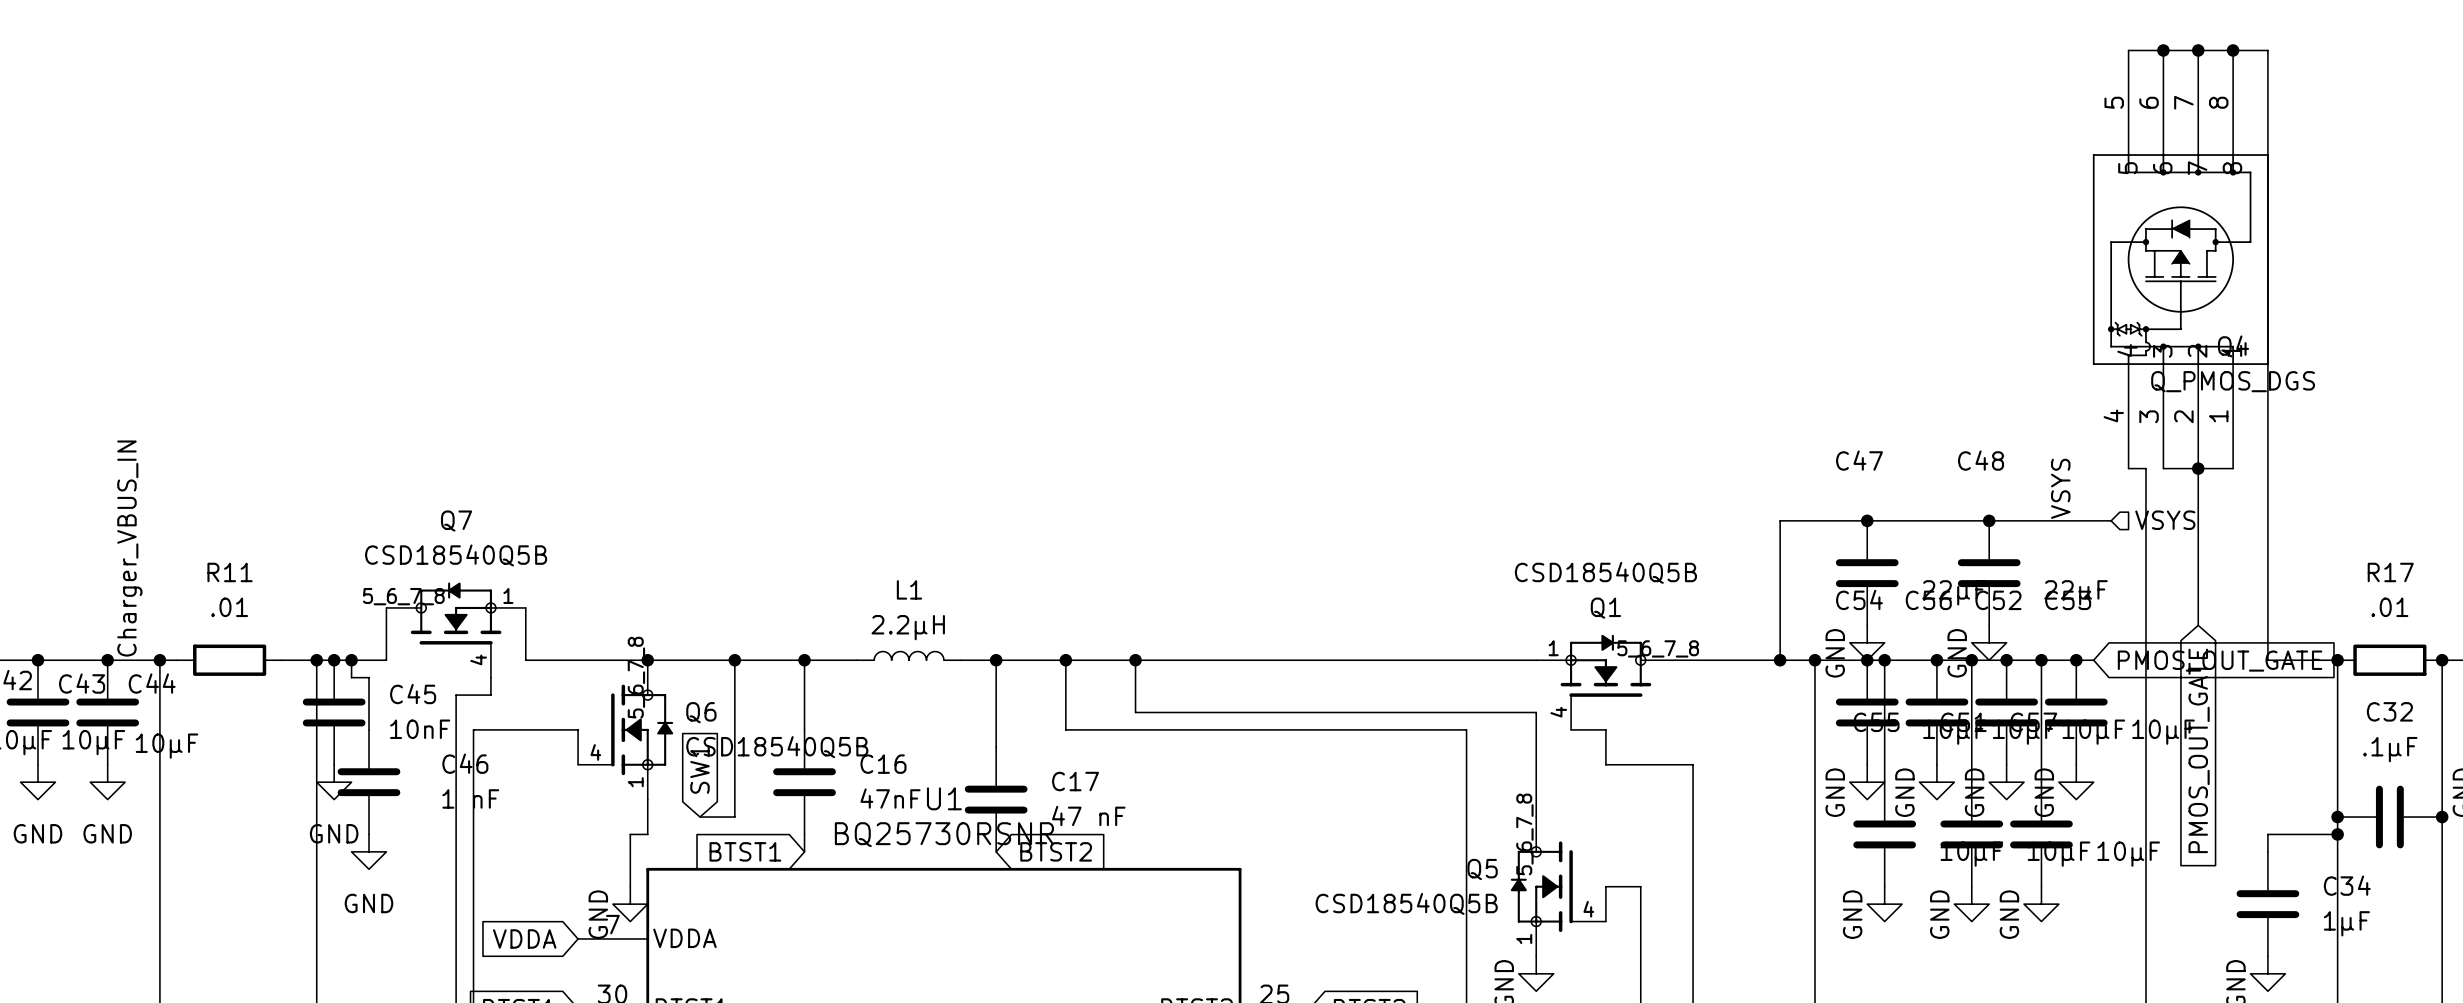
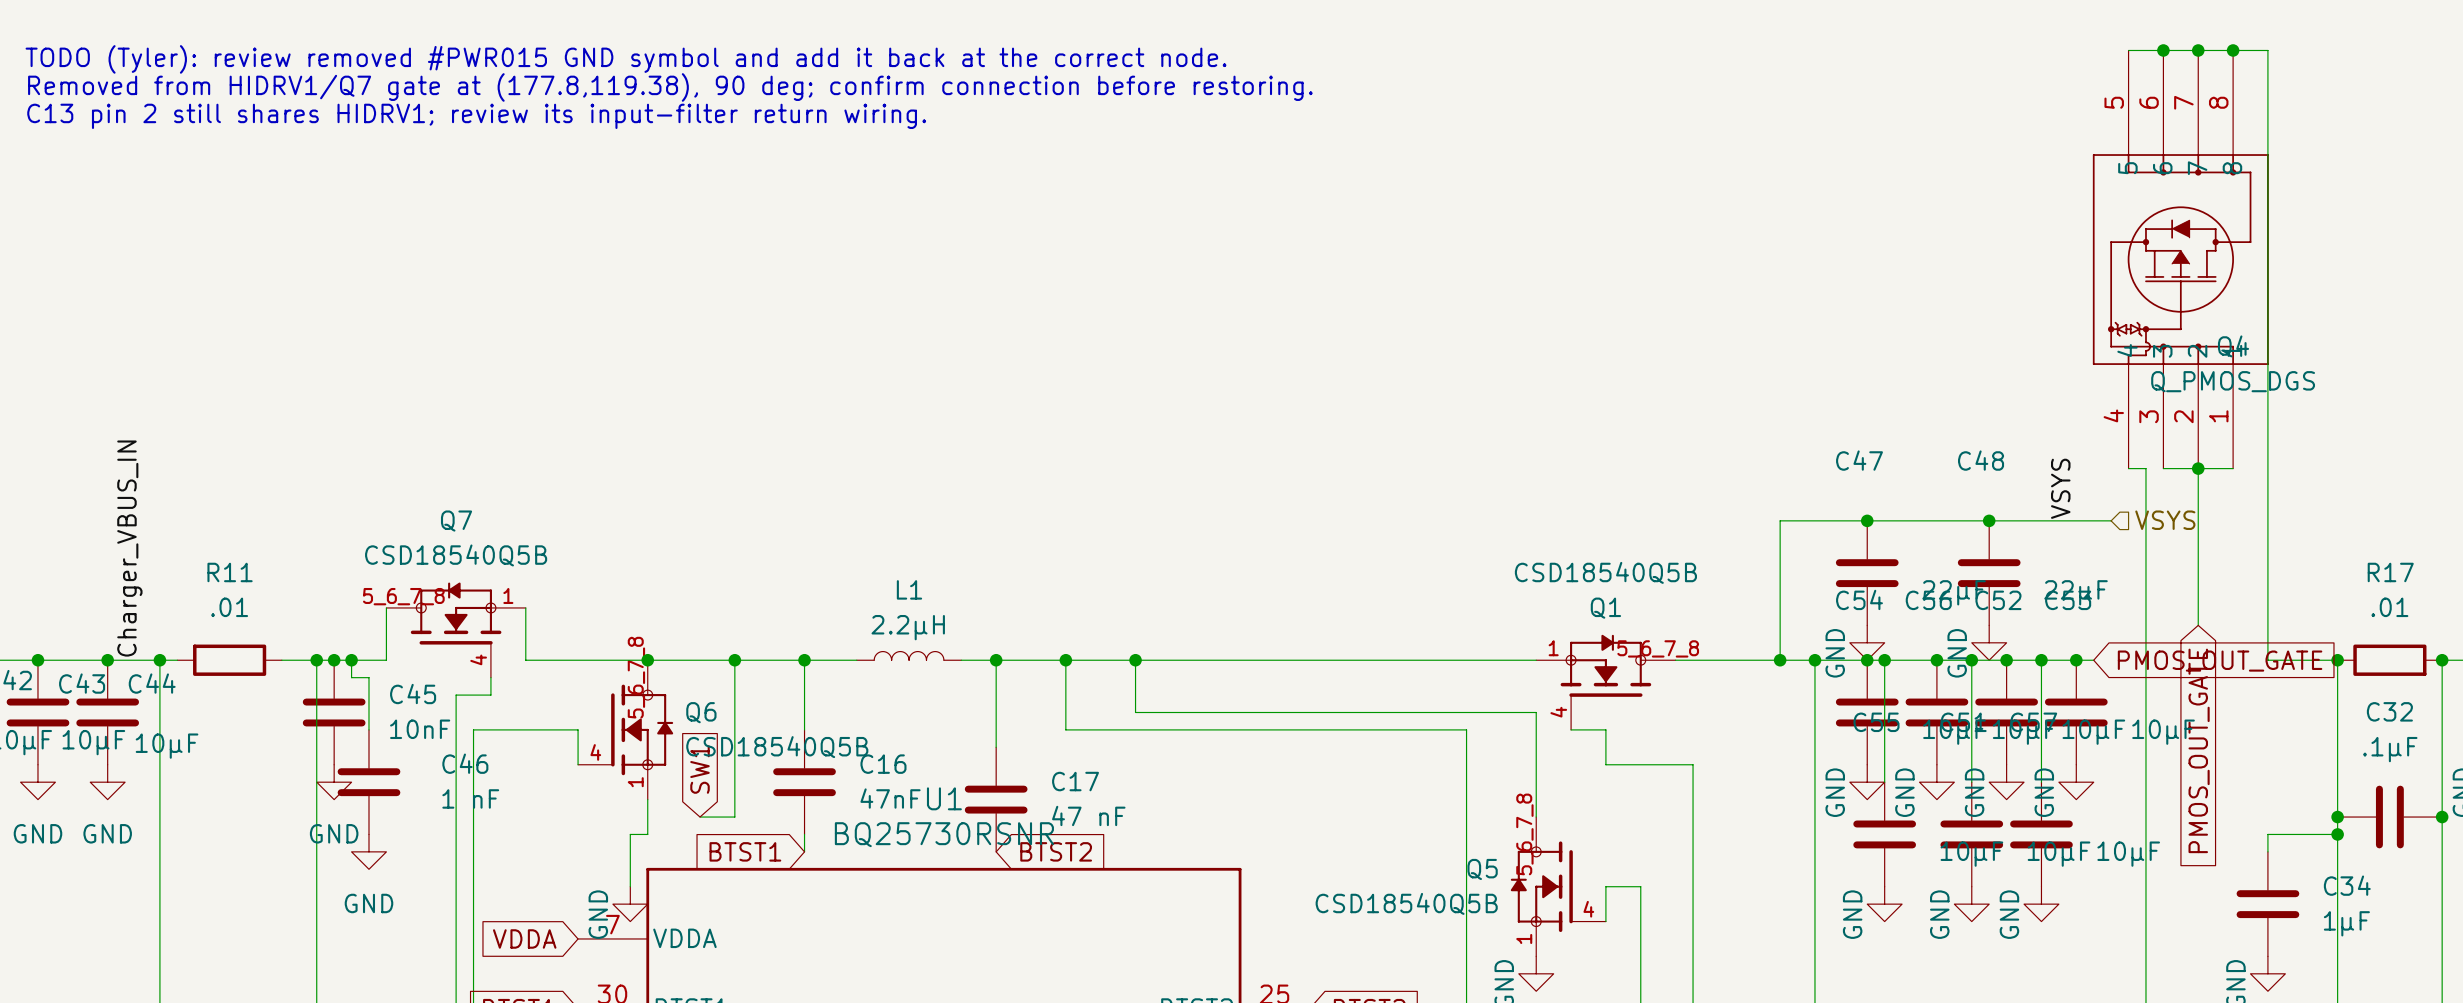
text: none -> TODO (Tyler): review removed #PWR015 GND symbol and add it back at the correct node. (626, 59)
text: none -> Removed from HIDRV1/Q7 gate at (177.8,119.38), 90 deg; confirm connection before restoring. (670, 87)
text: none -> C13 pin 2 still shares HIDRV1; review its input-filter return wiring. (476, 116)

